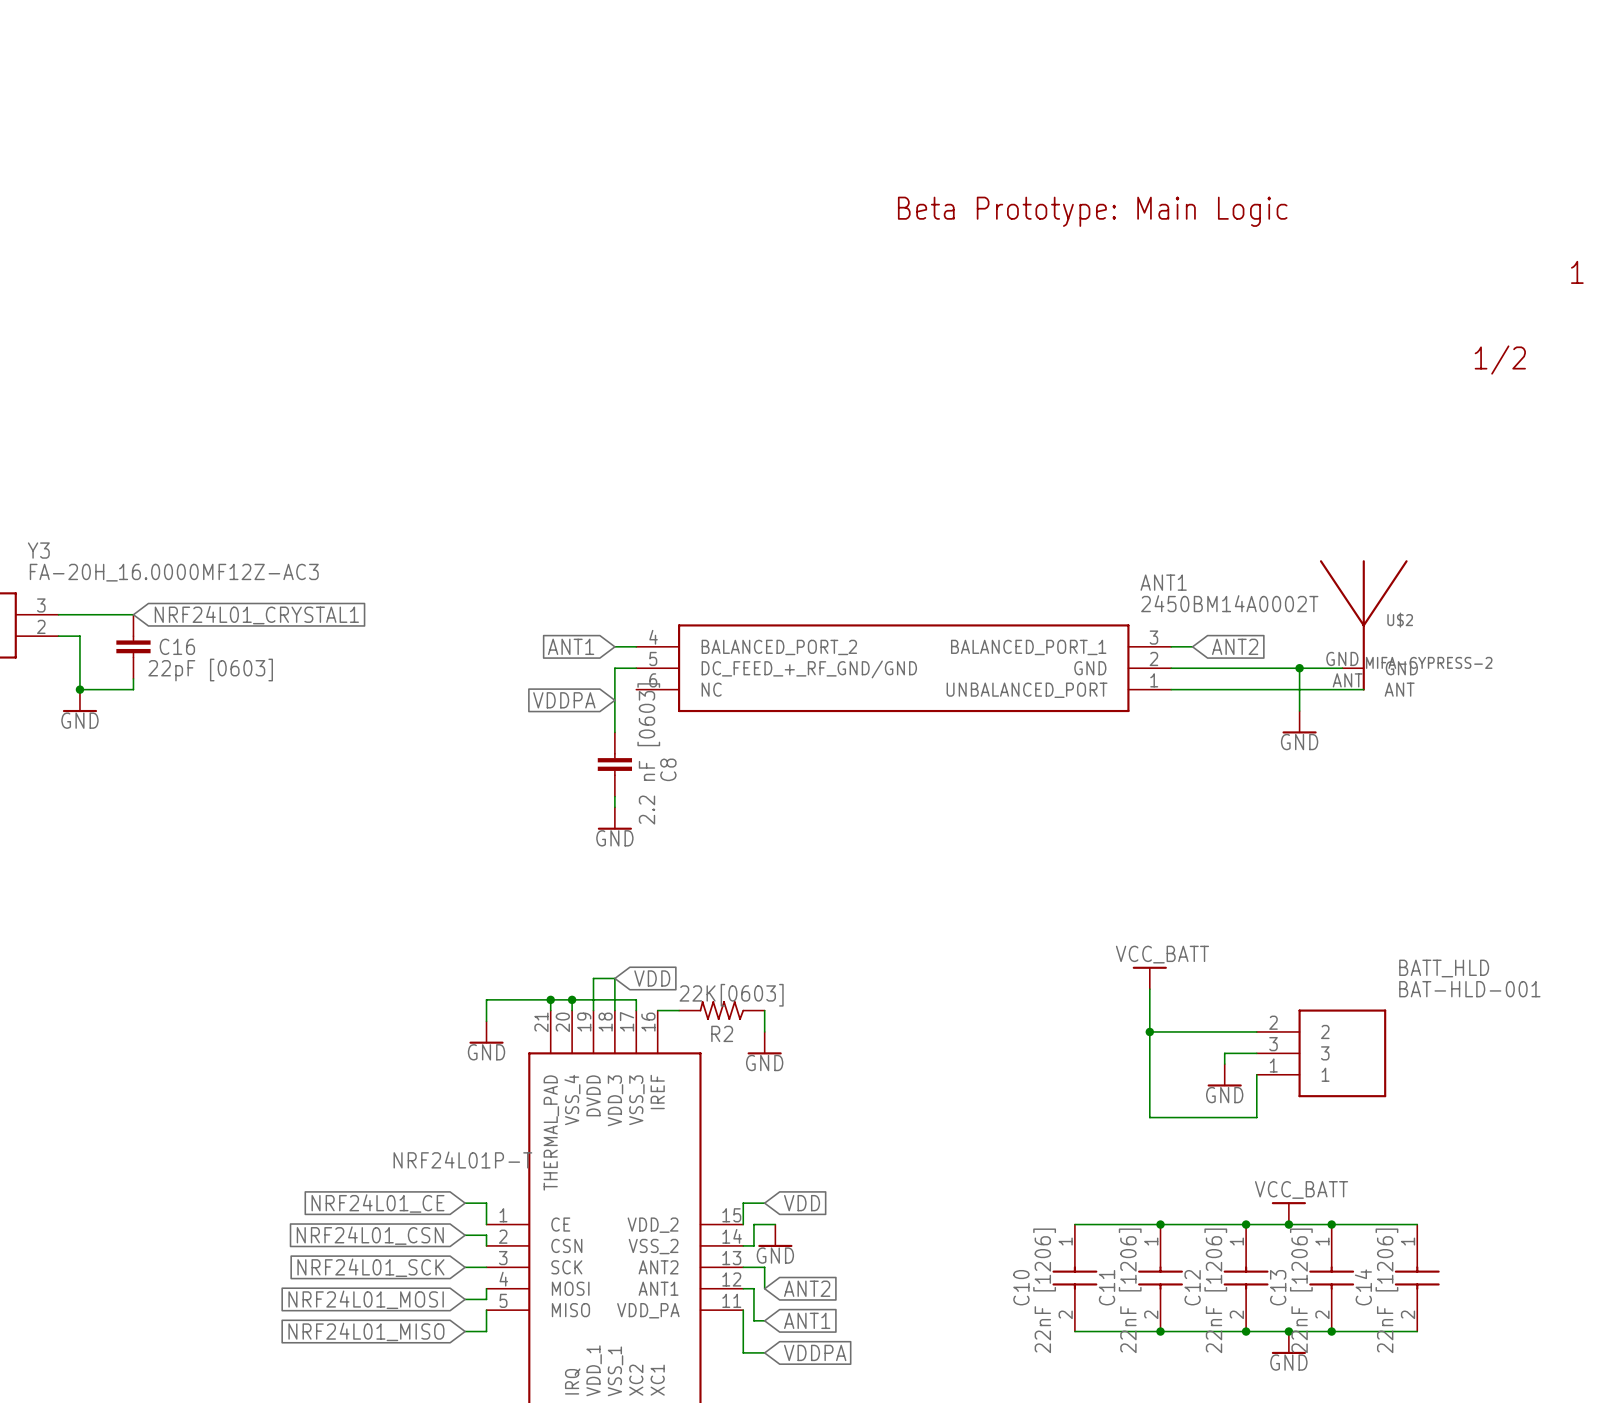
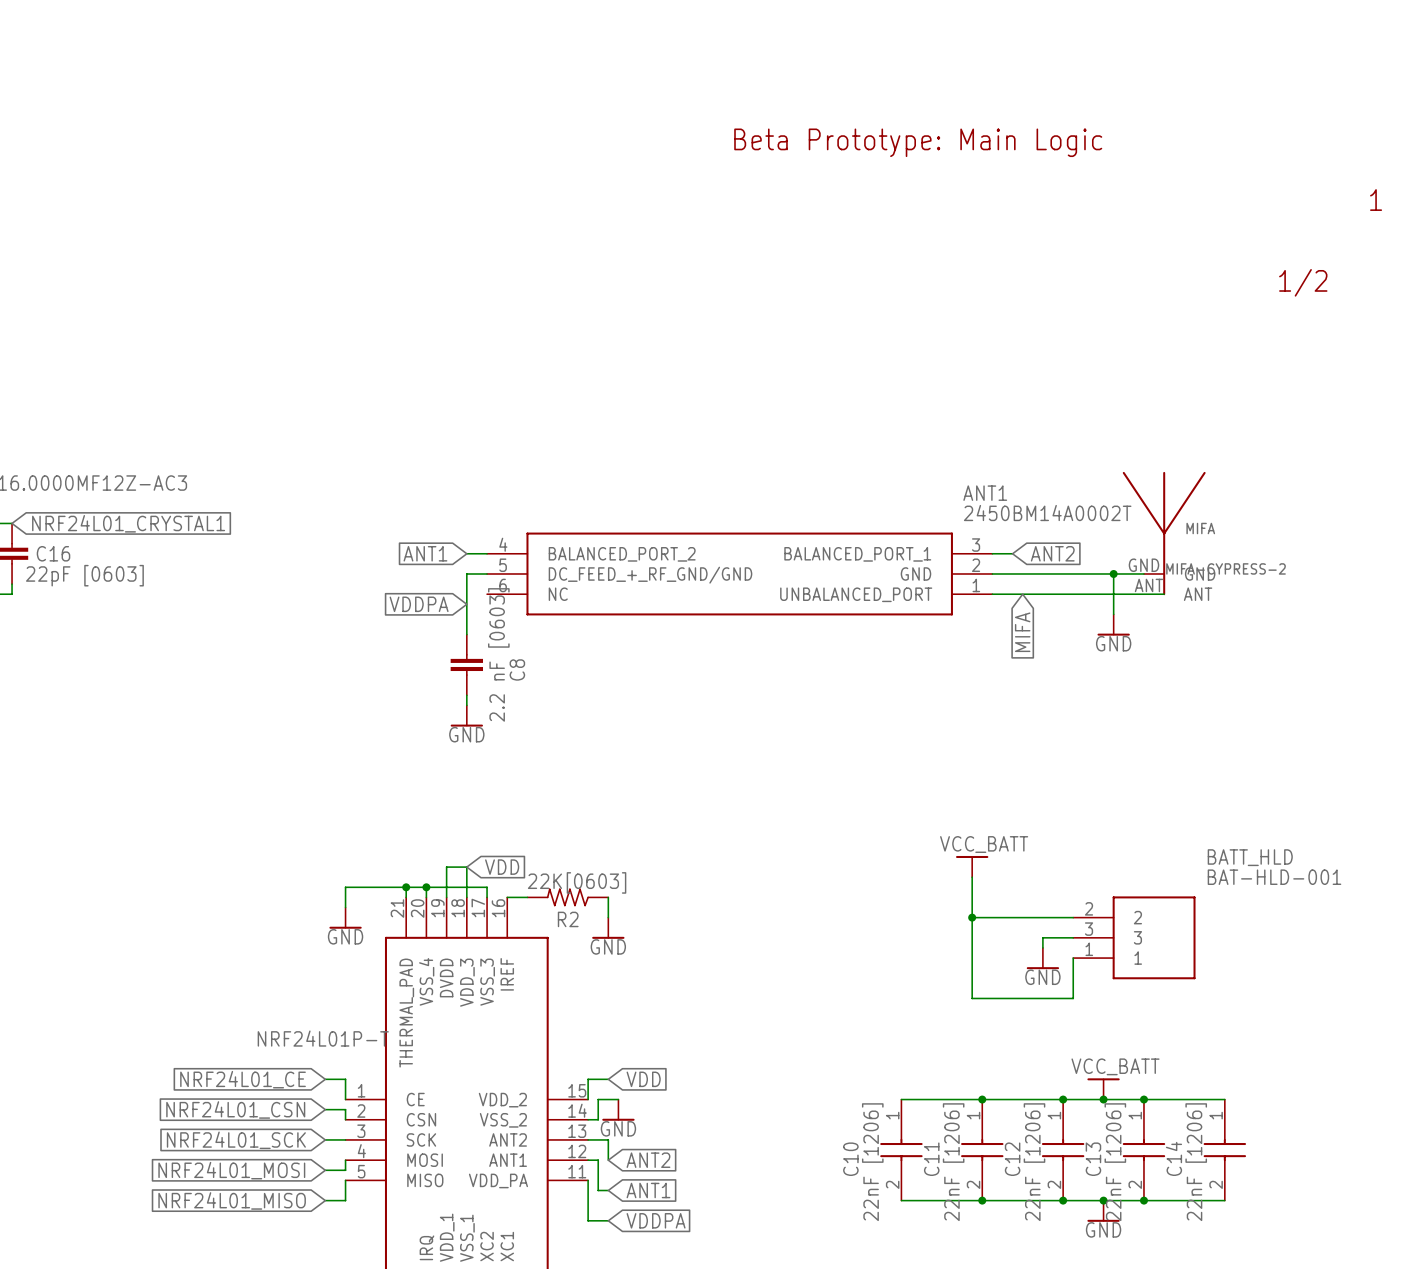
MIFA: none -> MIFA-CYPRESS-2 (1164, 533)
U$2: MIFA-CYPRESS-2 (1363, 625) -> none
wire: (1353, 689) (1363, 689) -> none
global label: none -> MIFA (1022, 632)

